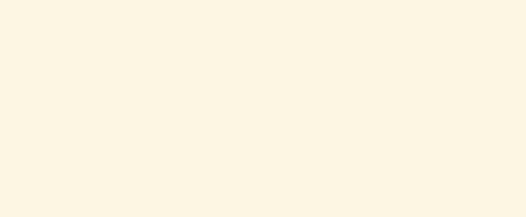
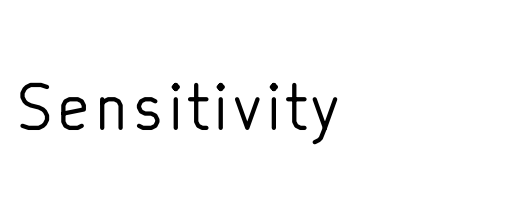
text: none -> Sensitivity (178, 113)

